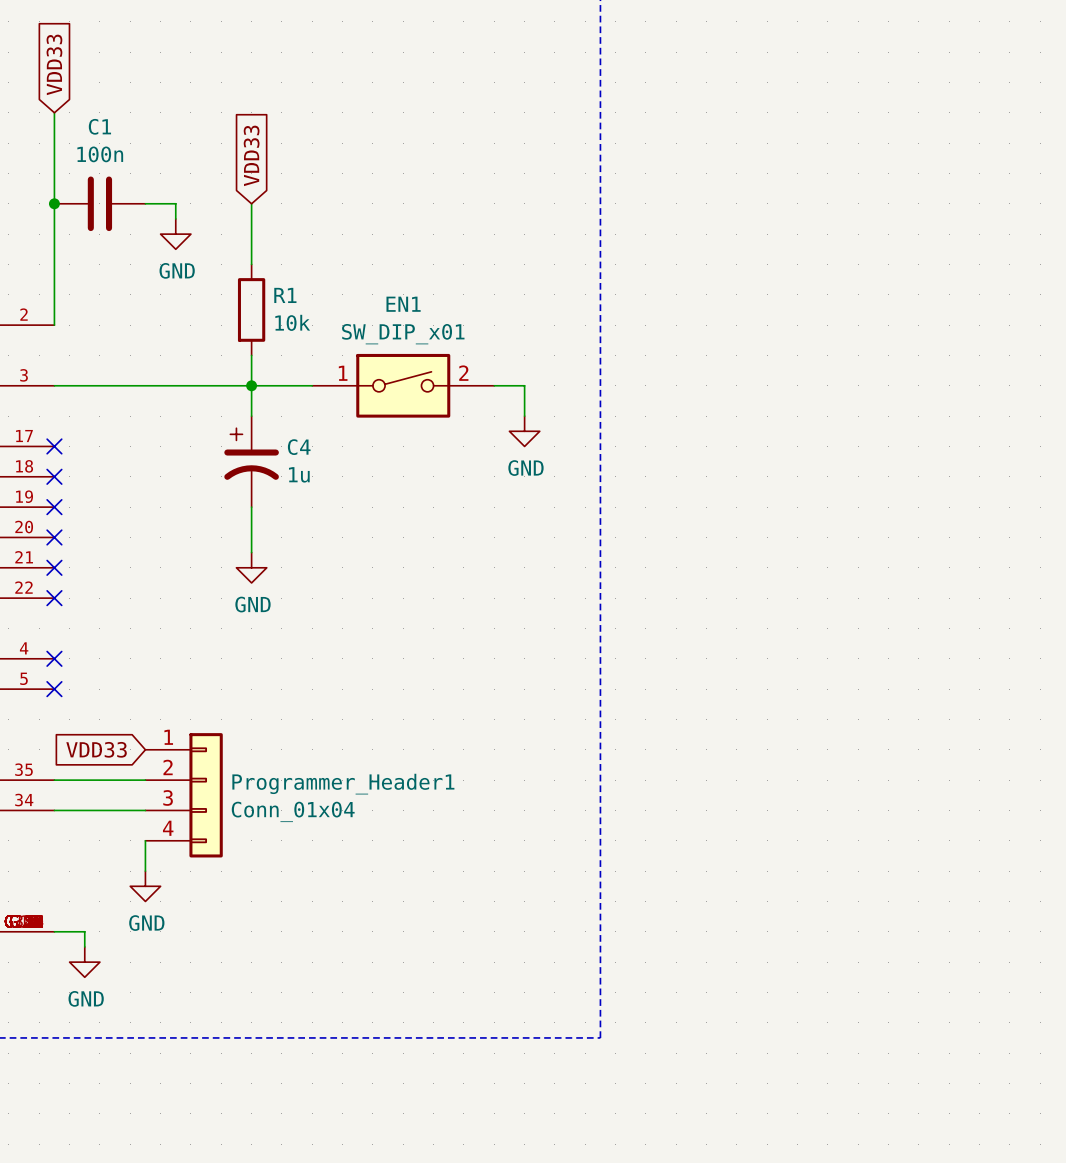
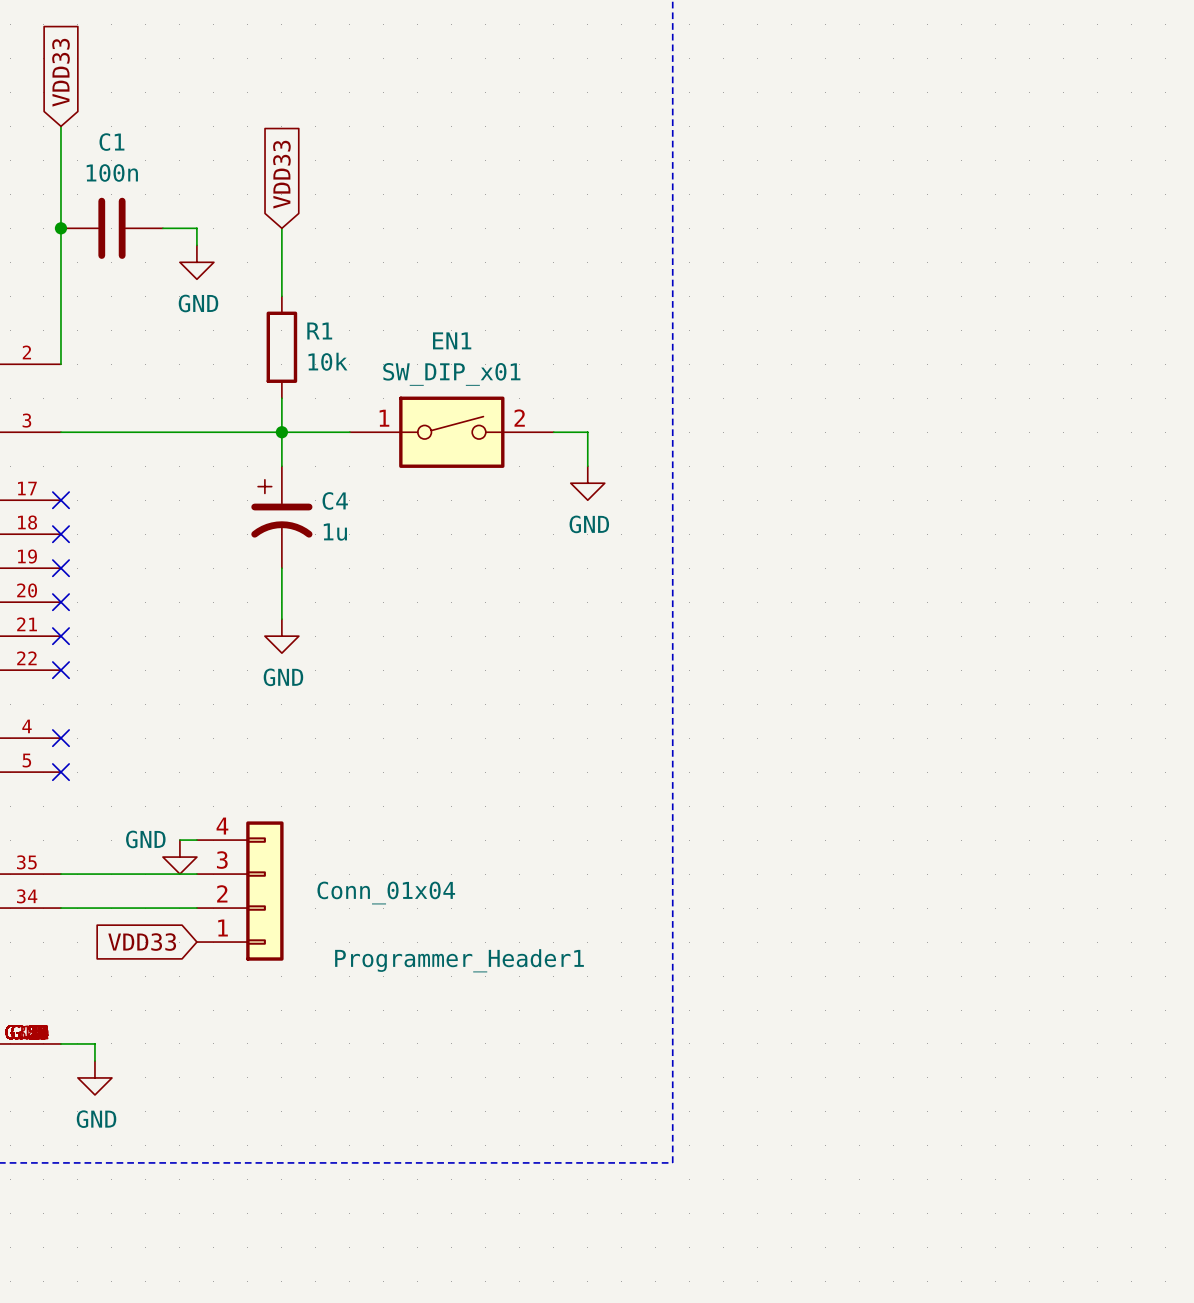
global label position: VDD33 (96, 749) -> VDD33 (142, 942)
Programmer_Header1 name position: Programmer_Header1 (343, 784) -> Programmer_Header1 (459, 960)
Programmer_Header1 flip: as is (206, 795) -> up-down (264, 891)
Programmer_Header1 value position: Conn_01x04 (293, 811) -> Conn_01x04 (386, 893)
wire: (145, 840) (145, 871) -> none
power symbol position: GND (145, 886) -> GND (179, 857)
power symbol text position: GND (146, 923) -> GND (145, 839)

